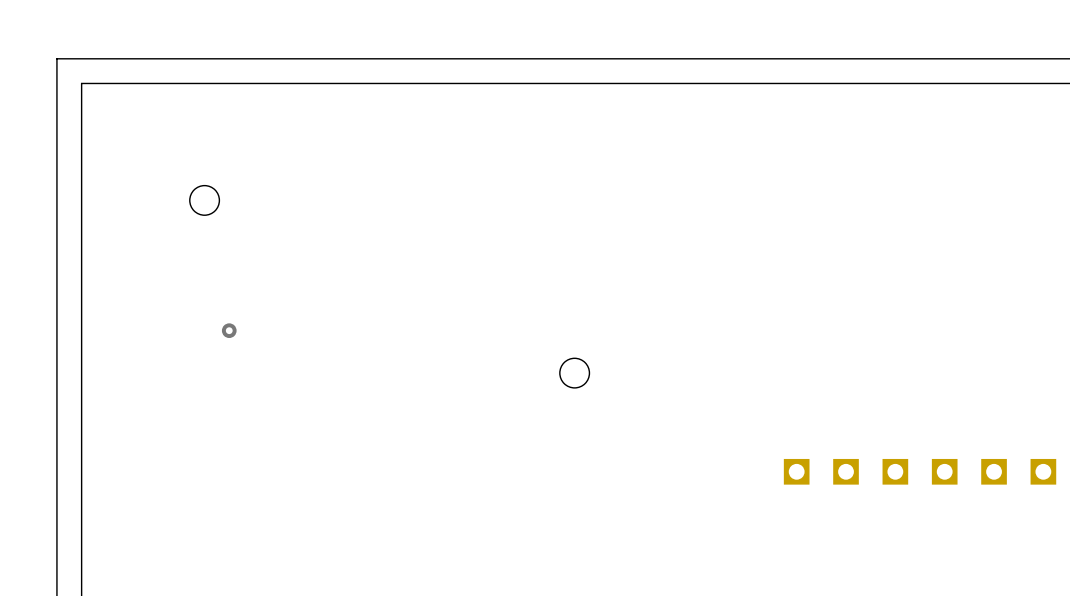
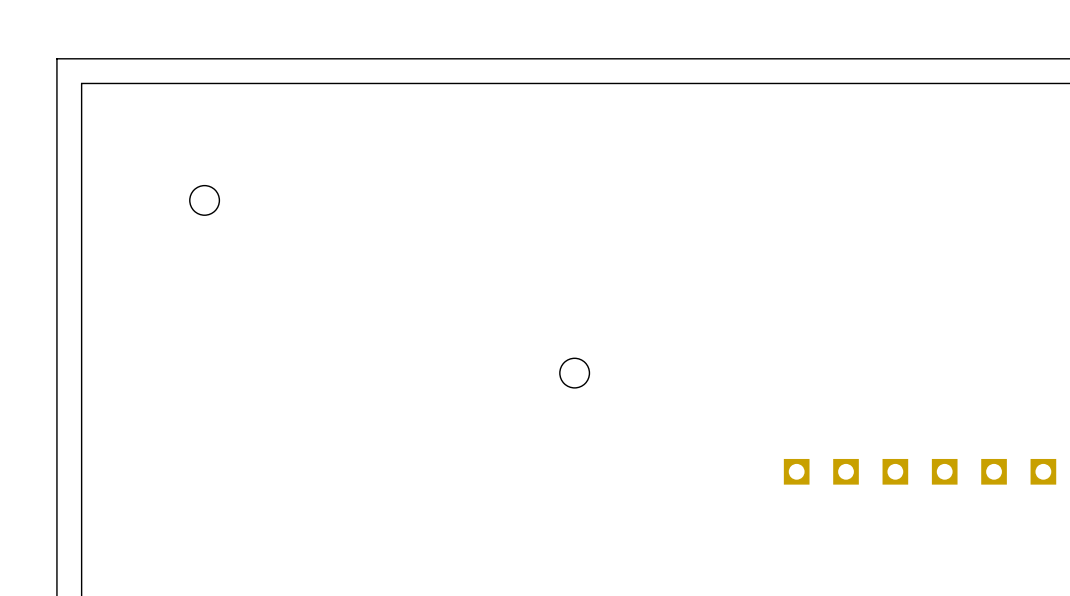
via: (229, 330) -> none

